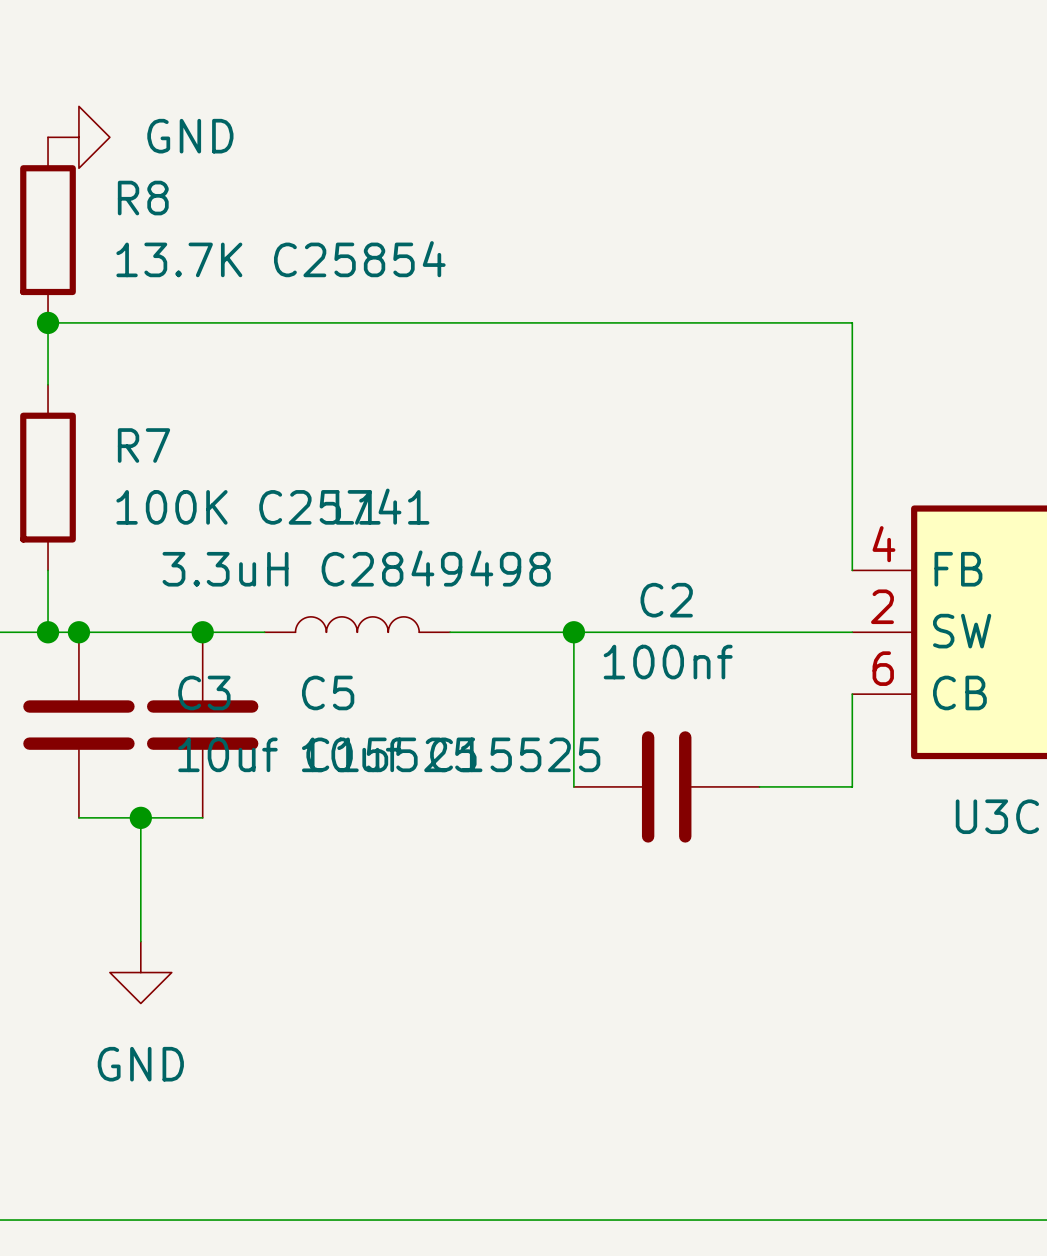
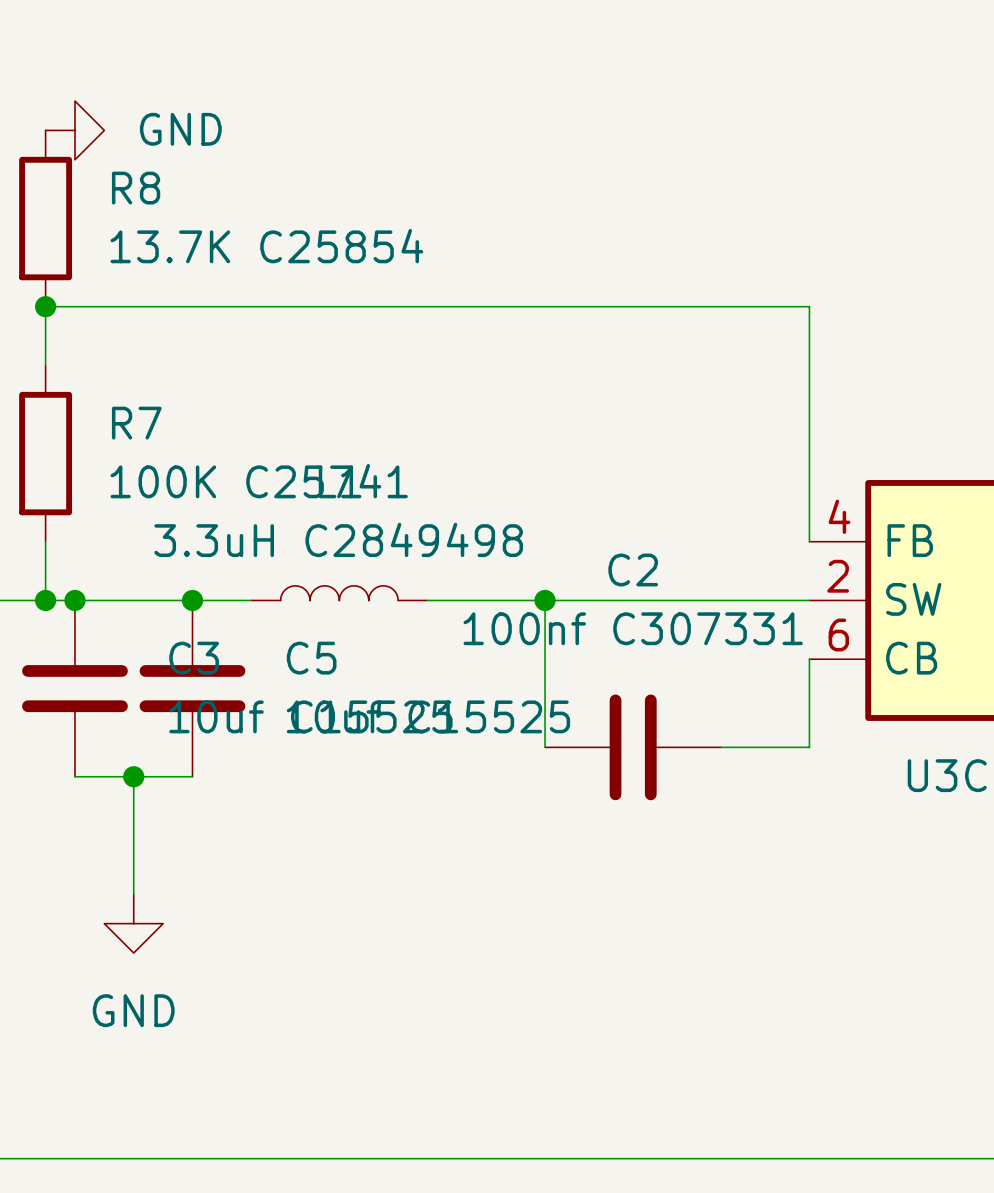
C2 value: 100nf (668, 662) -> 100nf C307331 (633, 628)

